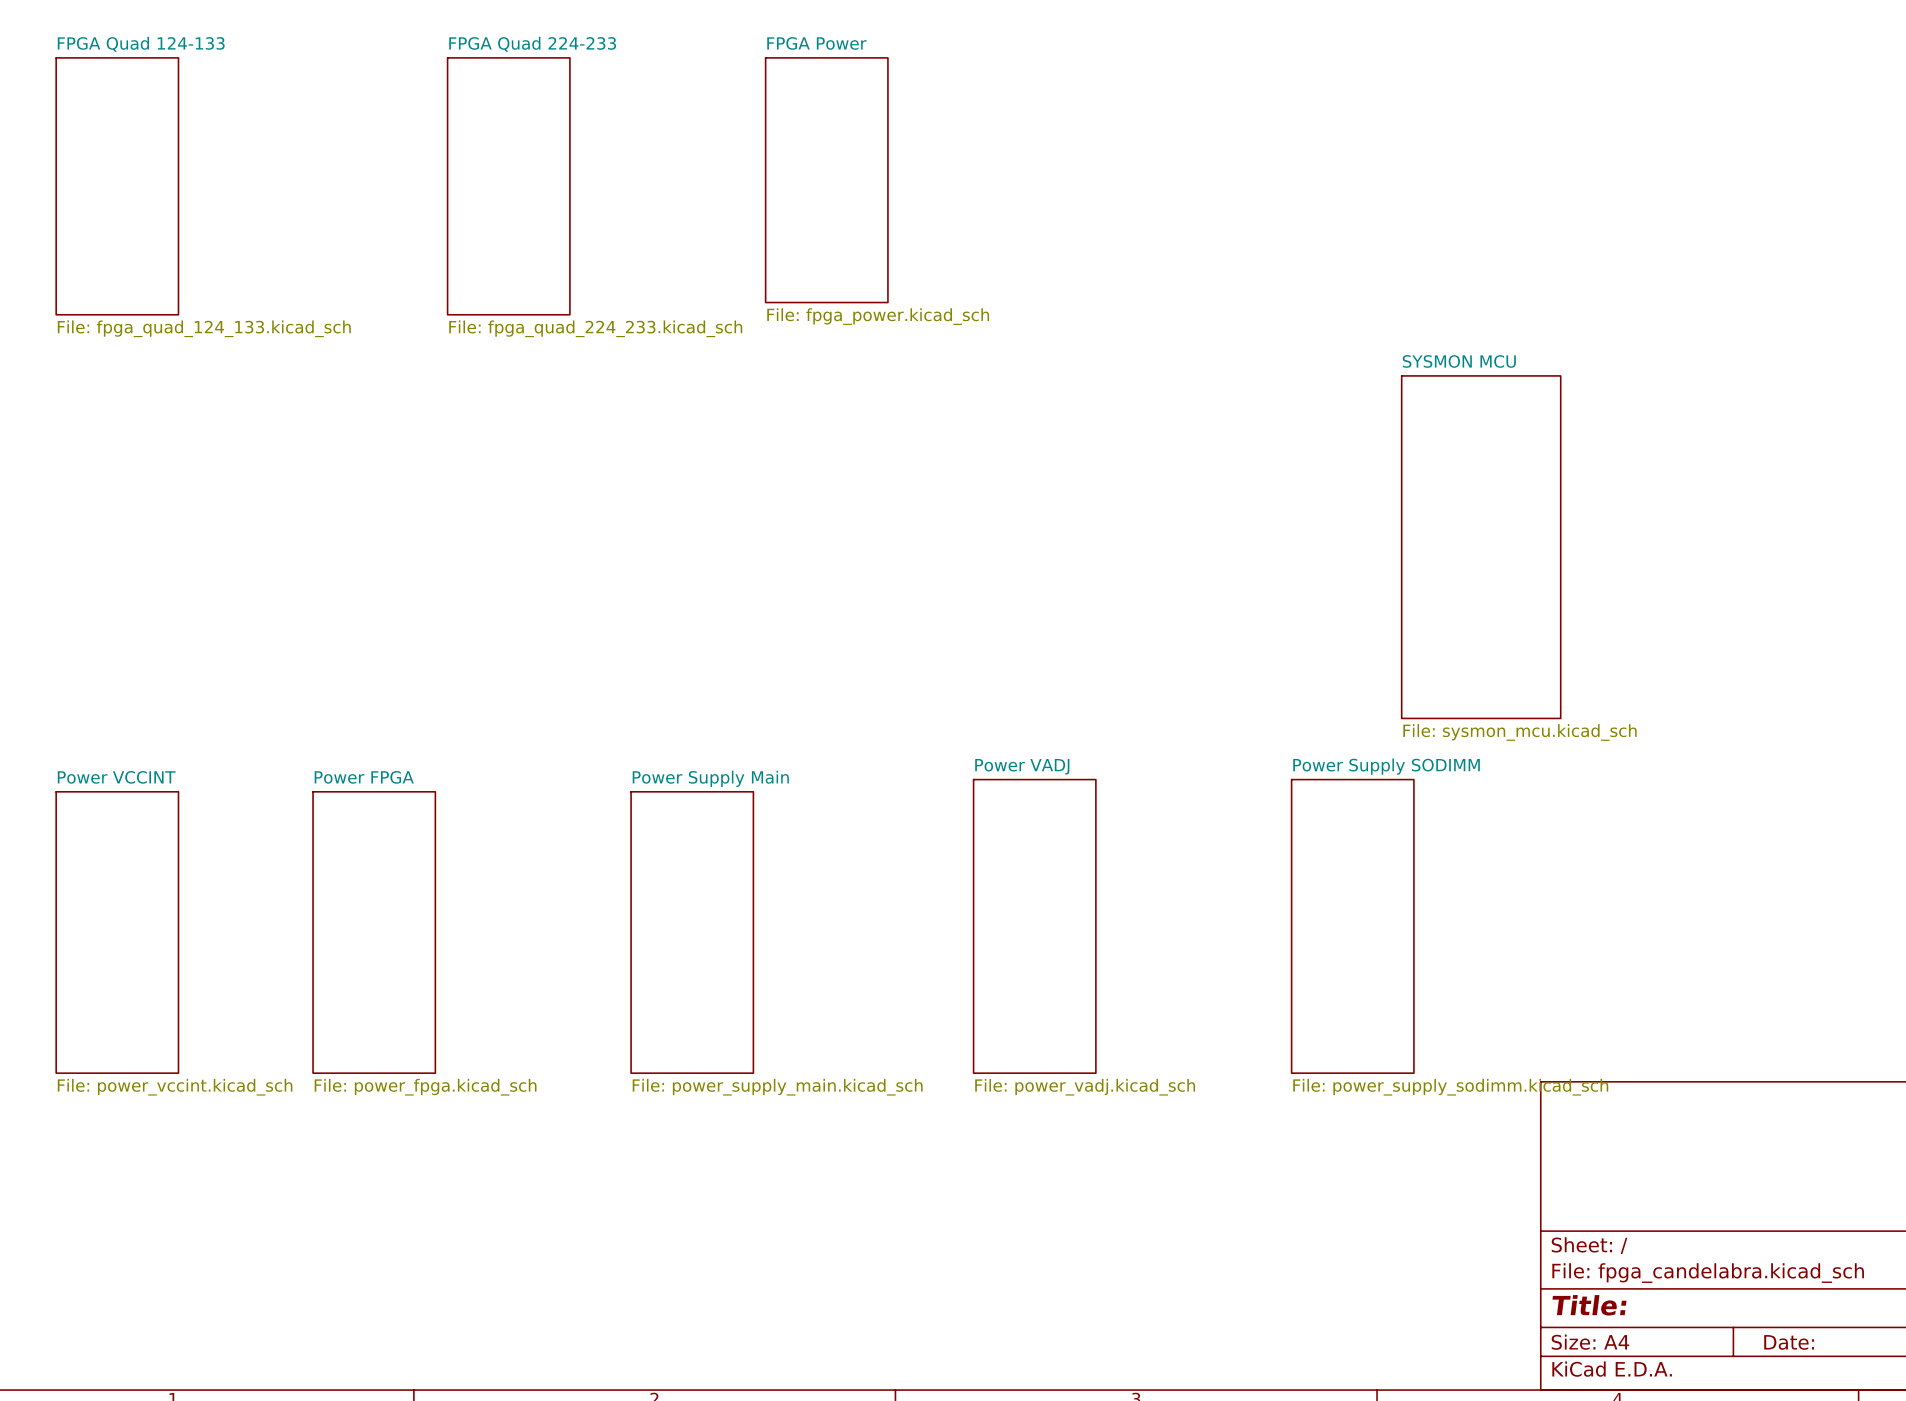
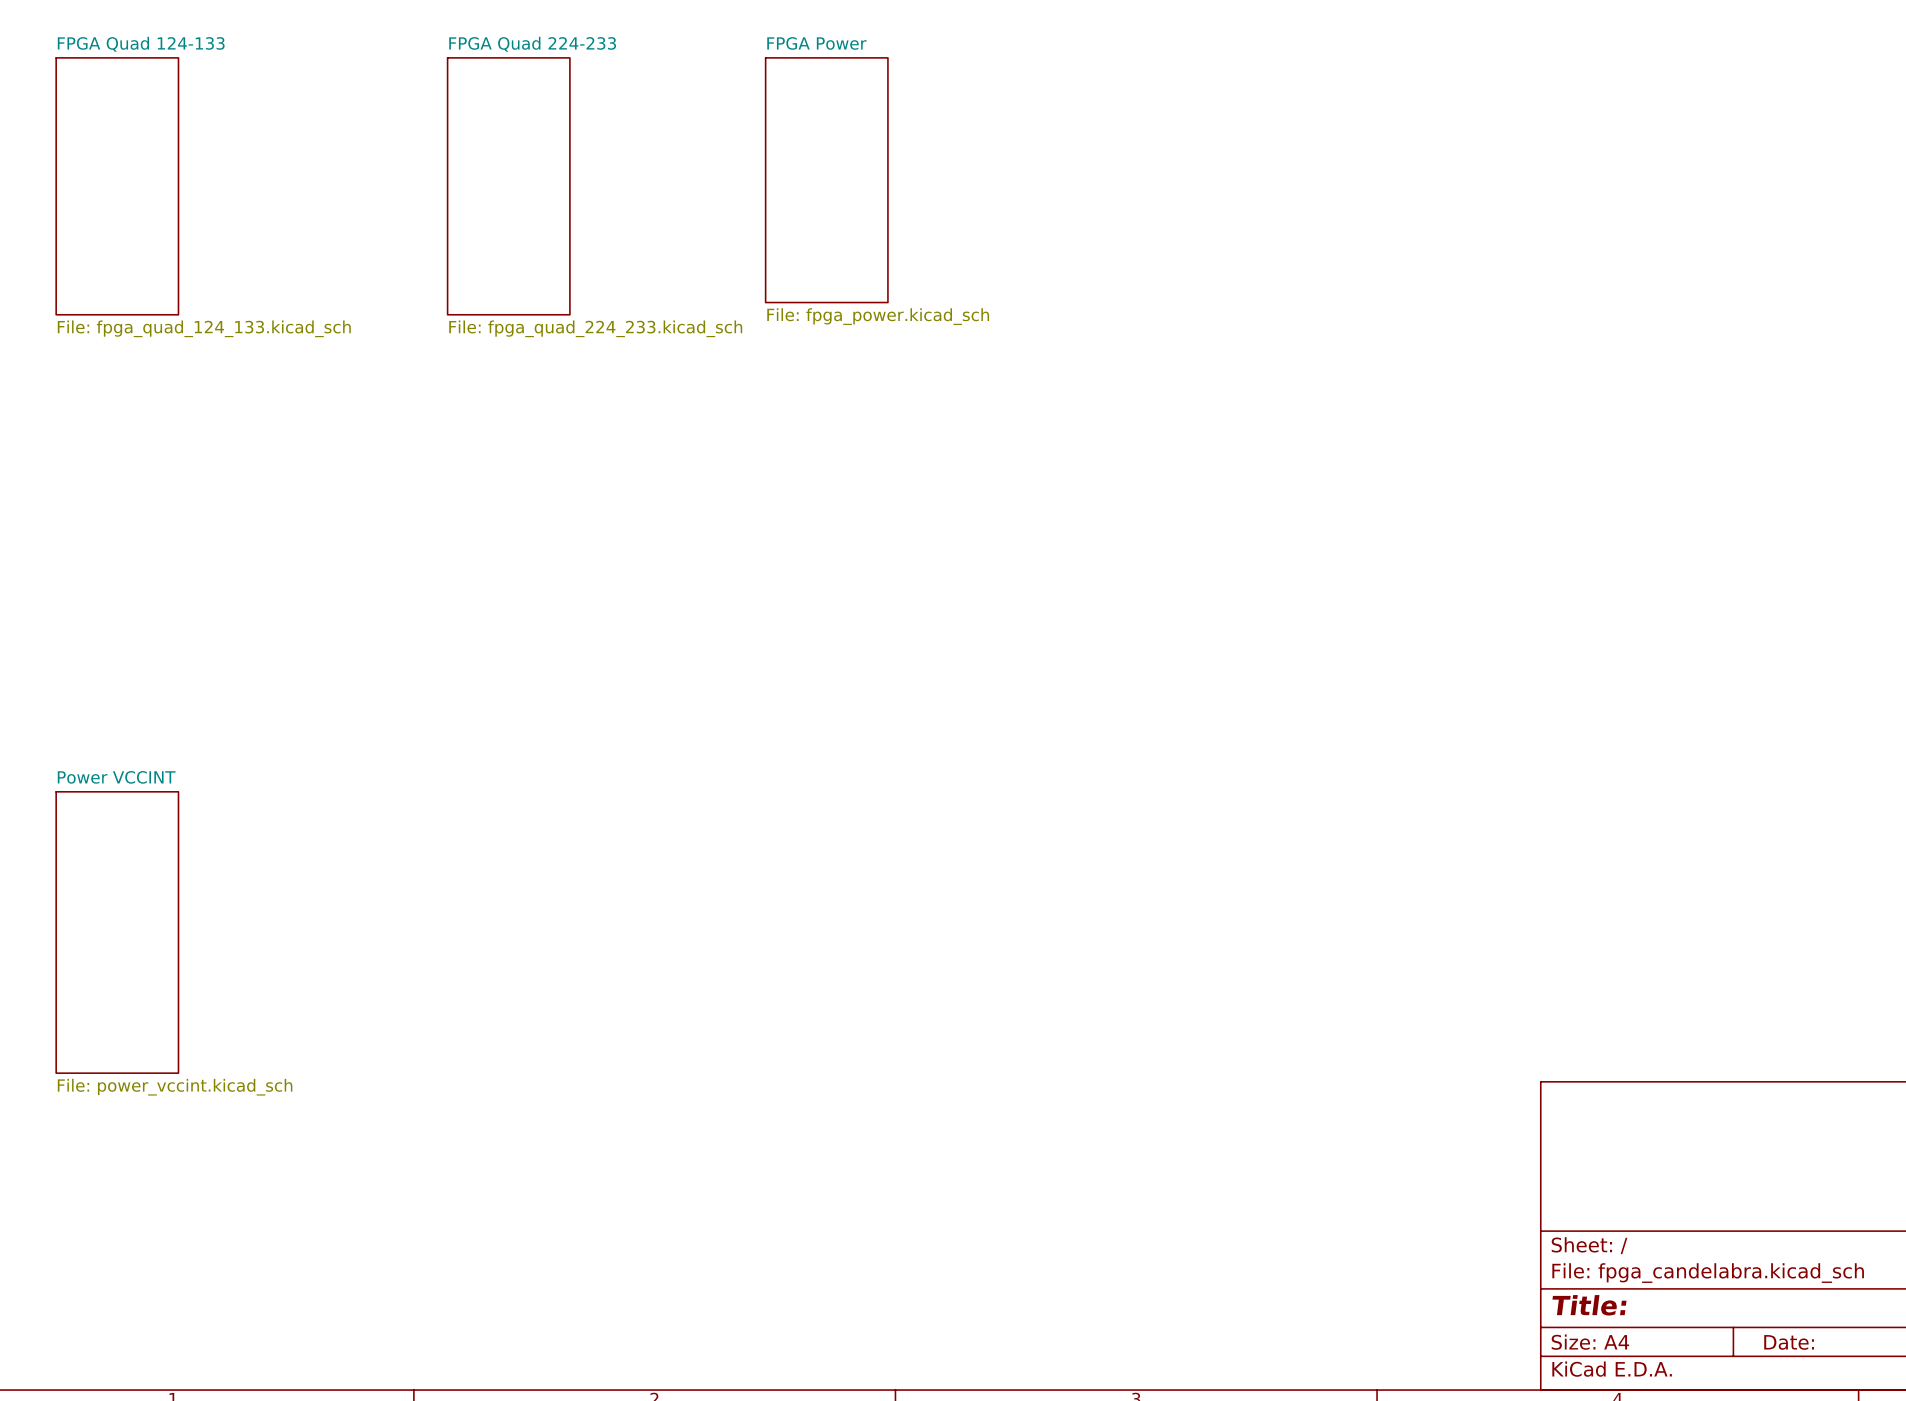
sheet SYSMON MCU: File: sysmon_mcu.kicad_sch (1481, 547) -> none
sheet Power VADJ: File: power_vadj.kicad_sch (1034, 926) -> none
sheet Power Supply SODIMM: File: power_supply_sodimm.kicad_sch (1352, 926) -> none
sheet Power FPGA: File: power_fpga.kicad_sch (374, 932) -> none
sheet Power Supply Main: File: power_supply_main.kicad_sch (692, 932) -> none

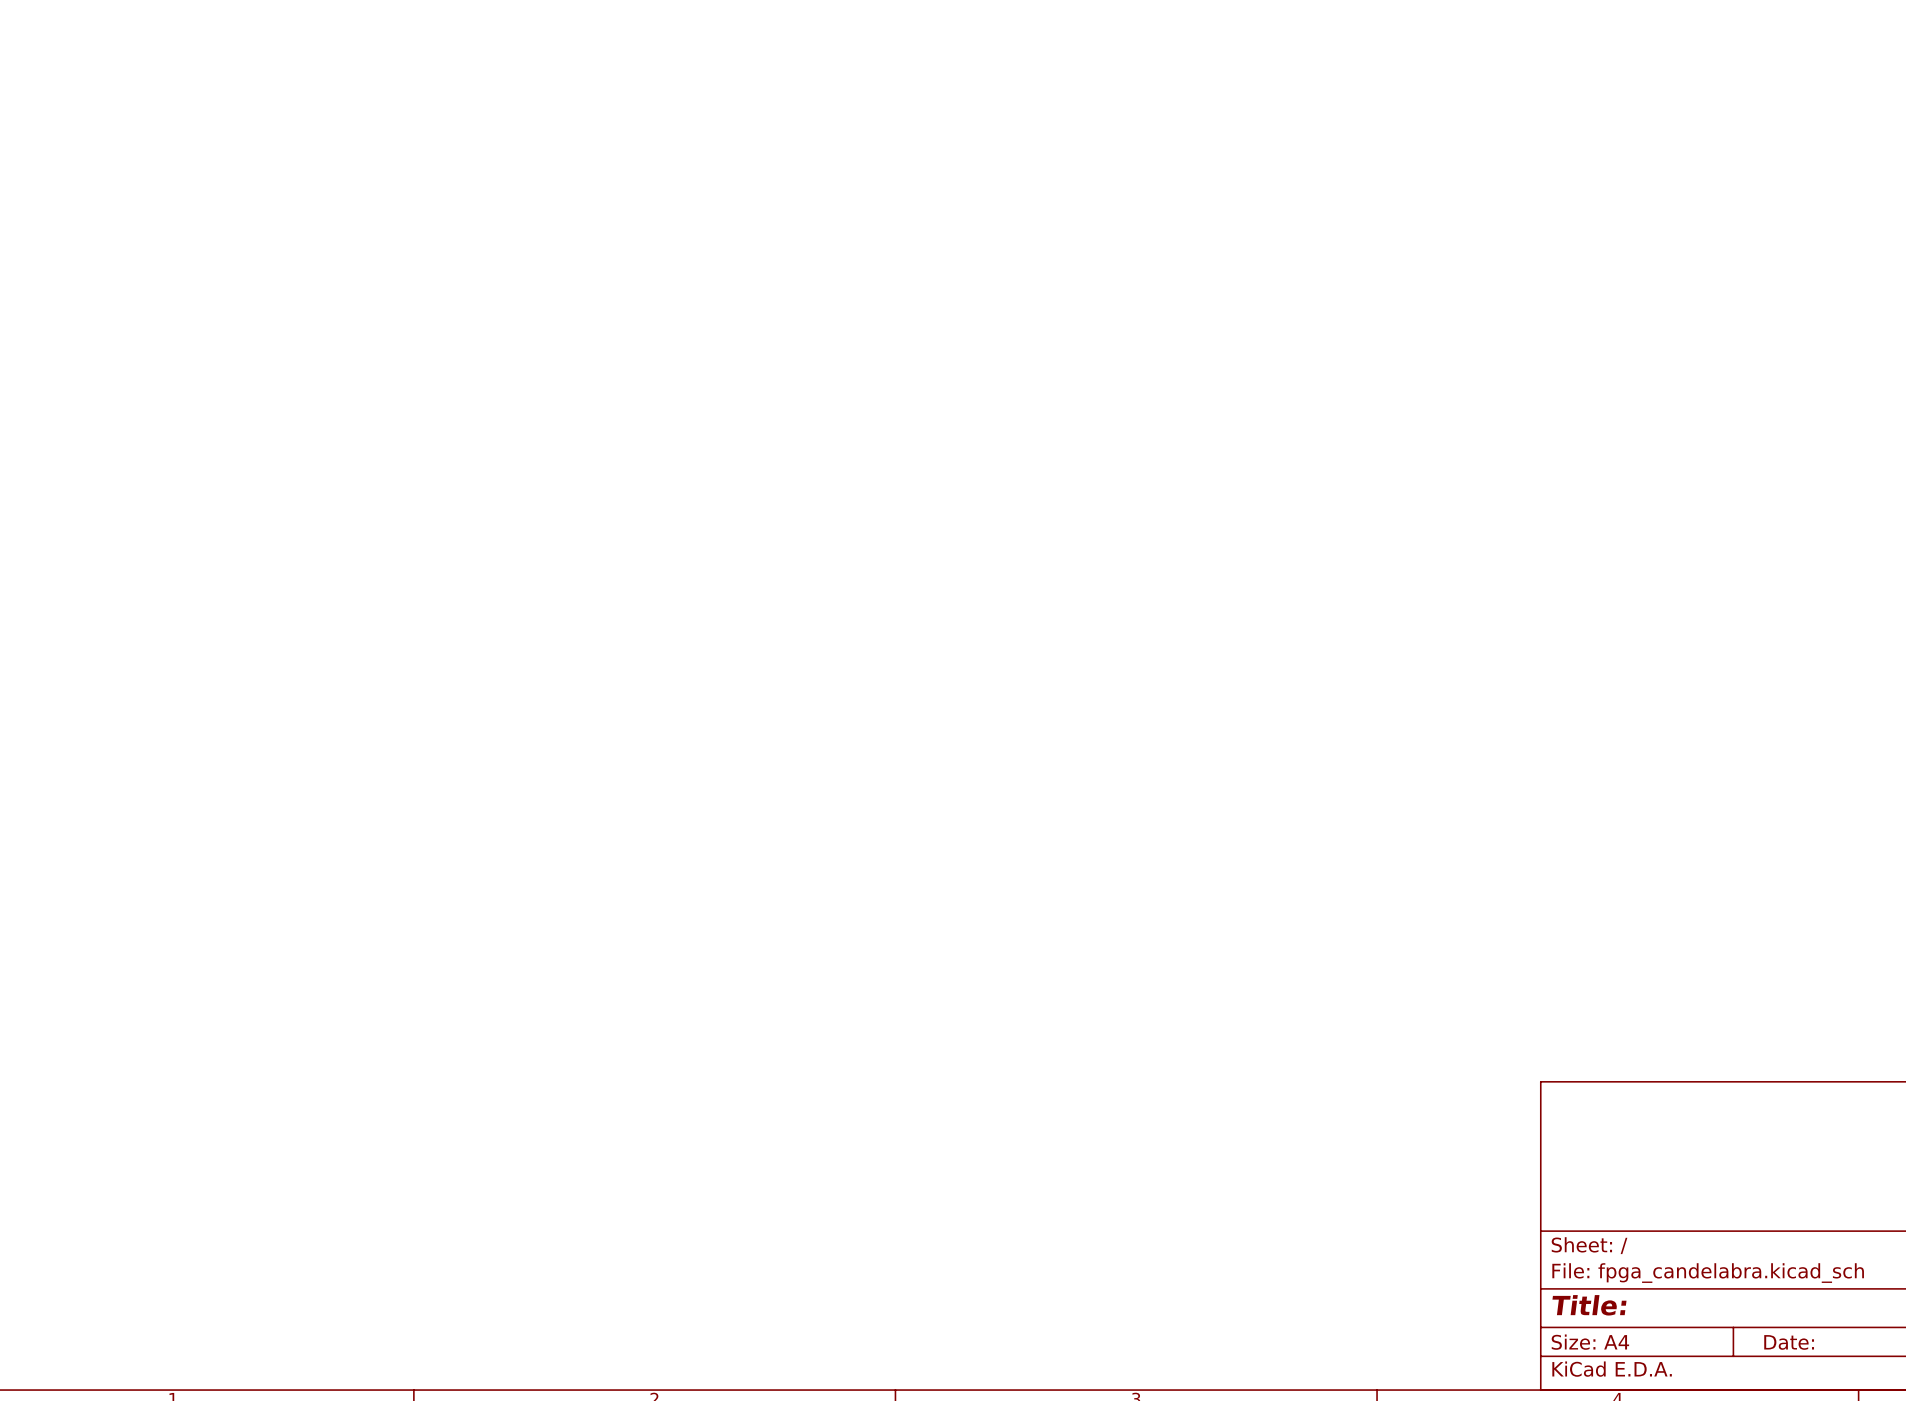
sheet FPGA Power: File: fpga_power.kicad_sch (826, 180) -> none
sheet FPGA Quad 124-133: File: fpga_quad_124_133.kicad_sch (117, 186) -> none
sheet FPGA Quad 224-233: File: fpga_quad_224_233.kicad_sch (508, 186) -> none
sheet Power VCCINT: File: power_vccint.kicad_sch (117, 932) -> none

